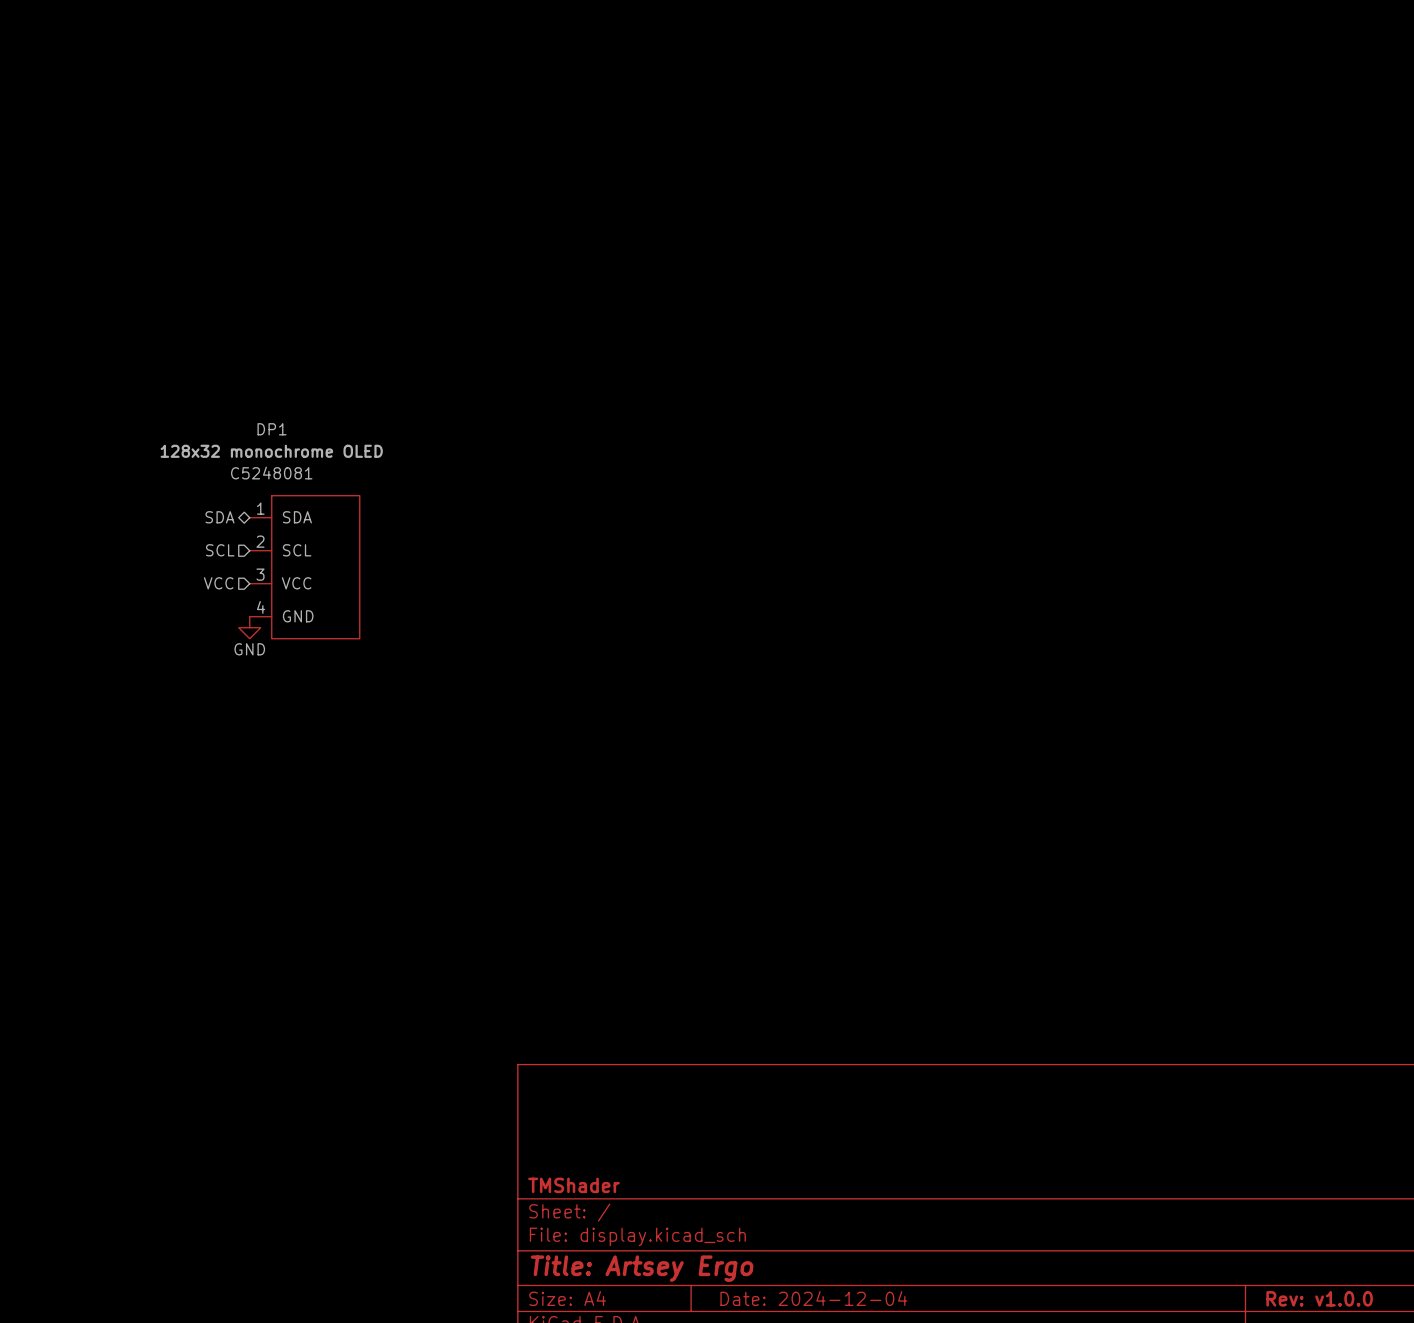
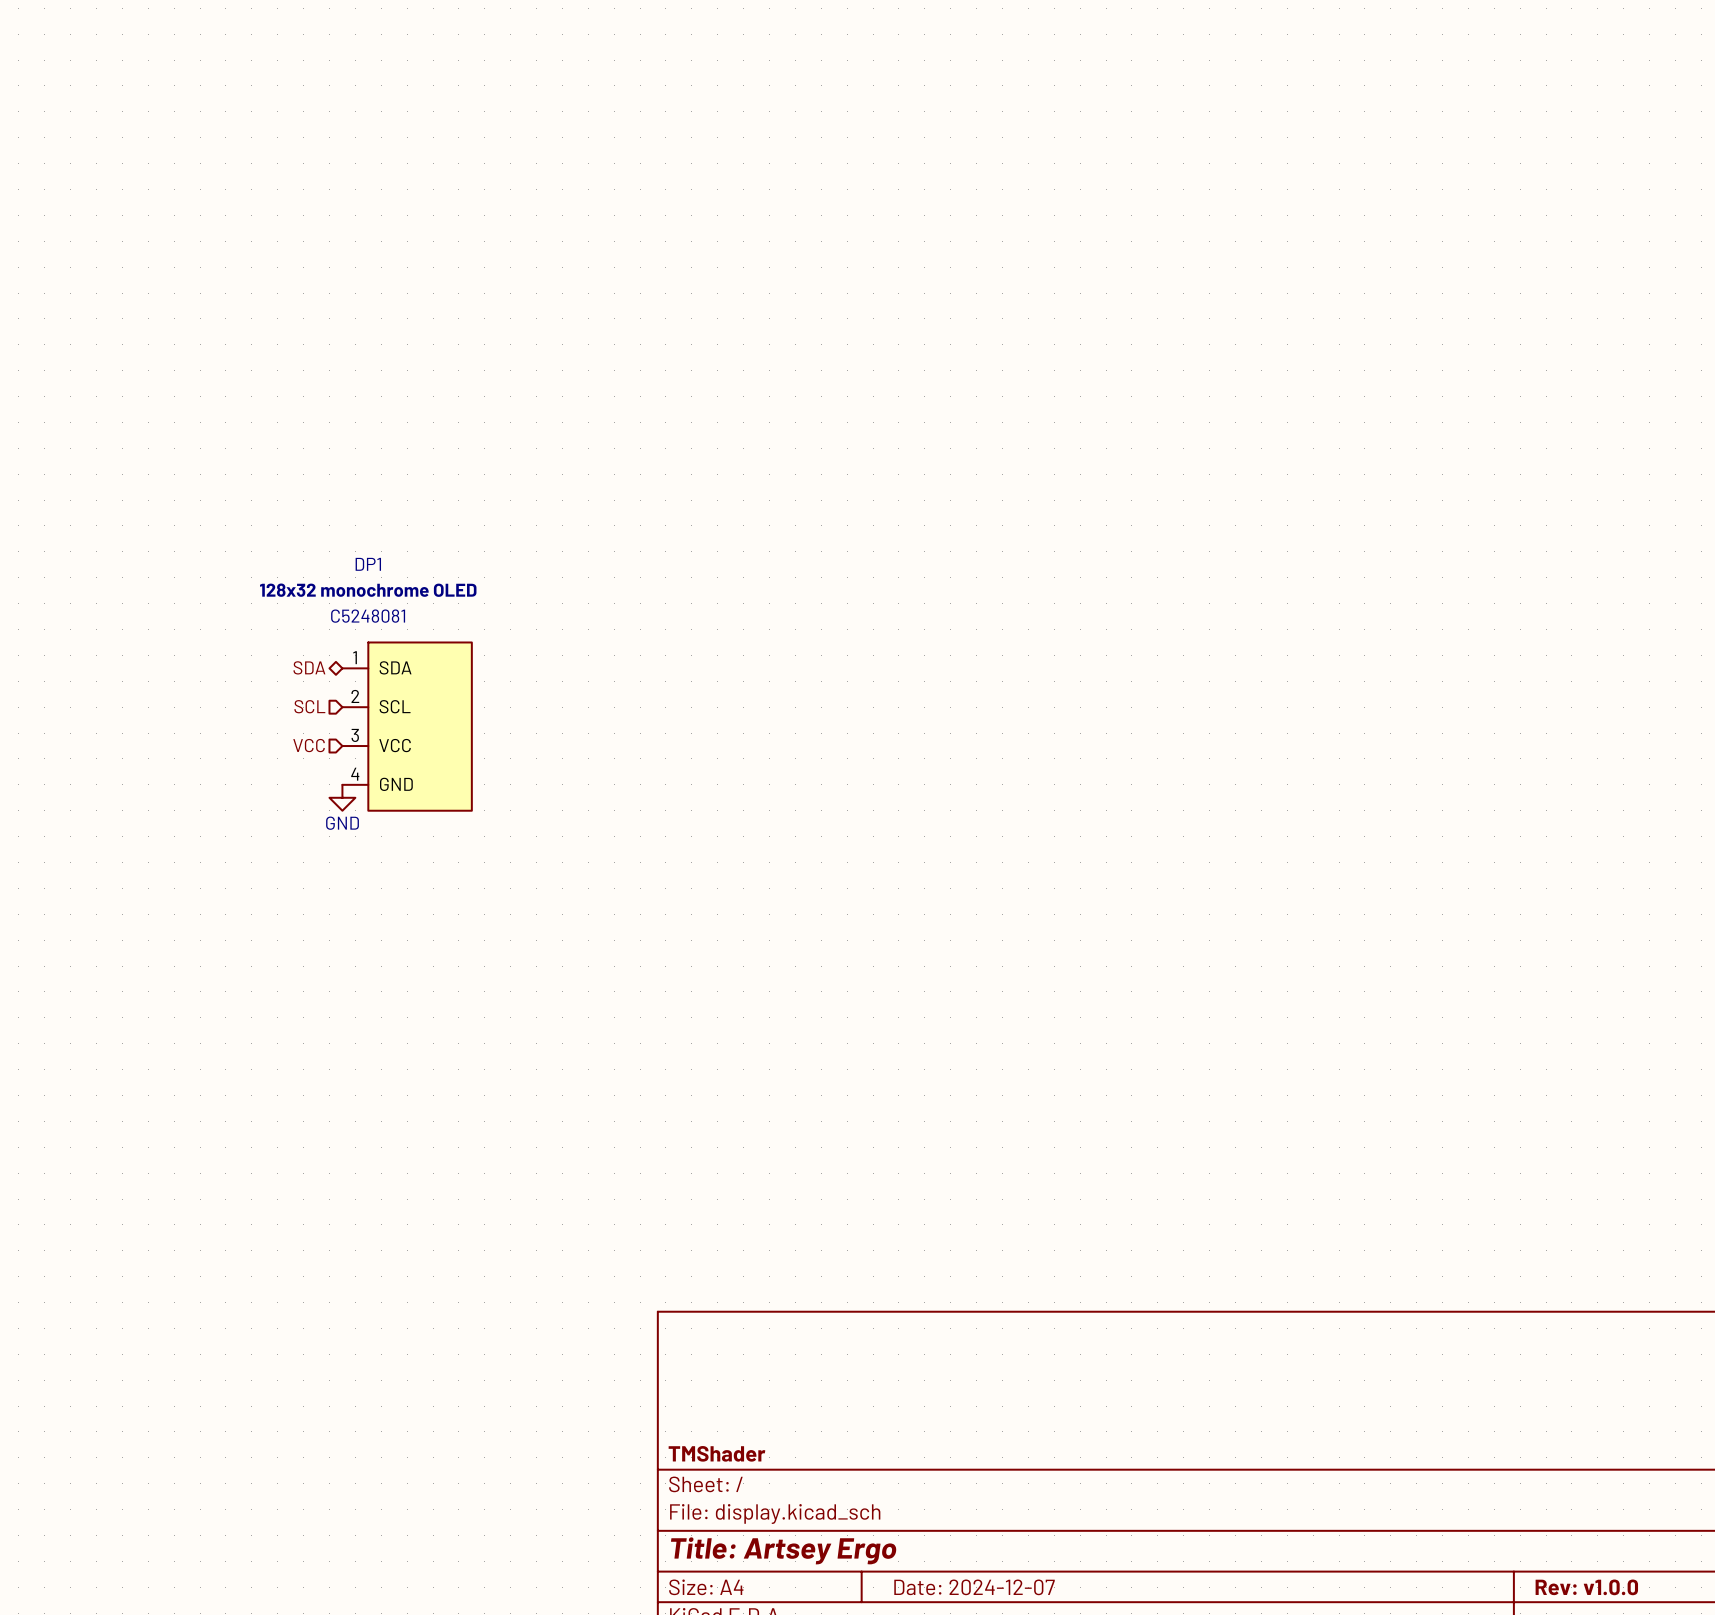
title block: Date: 2024-12-04 (813, 1298) -> Date: 2024-12-07 (974, 1587)

